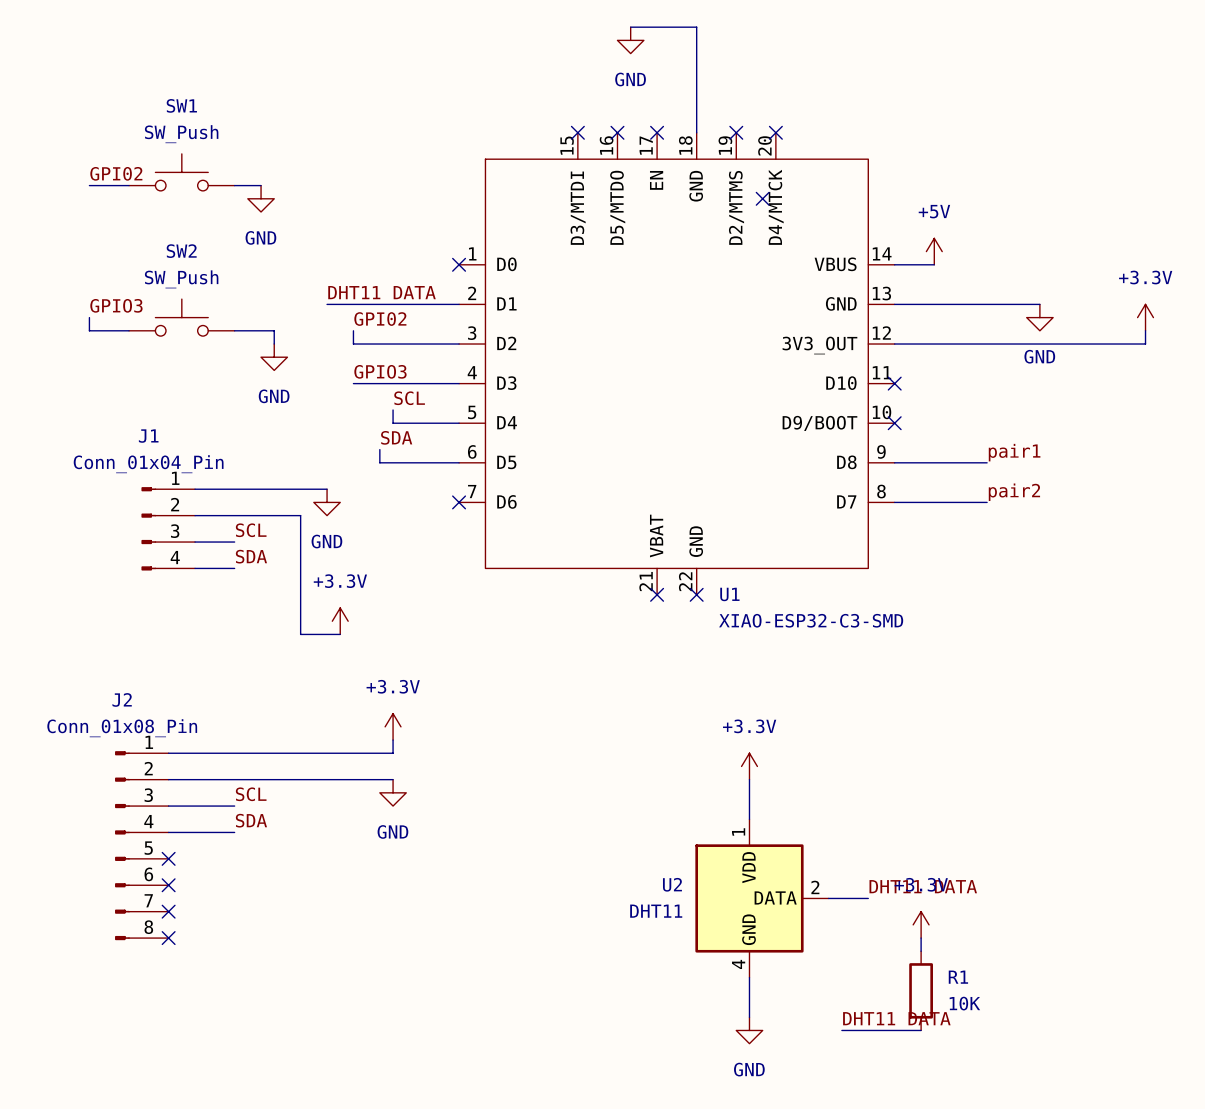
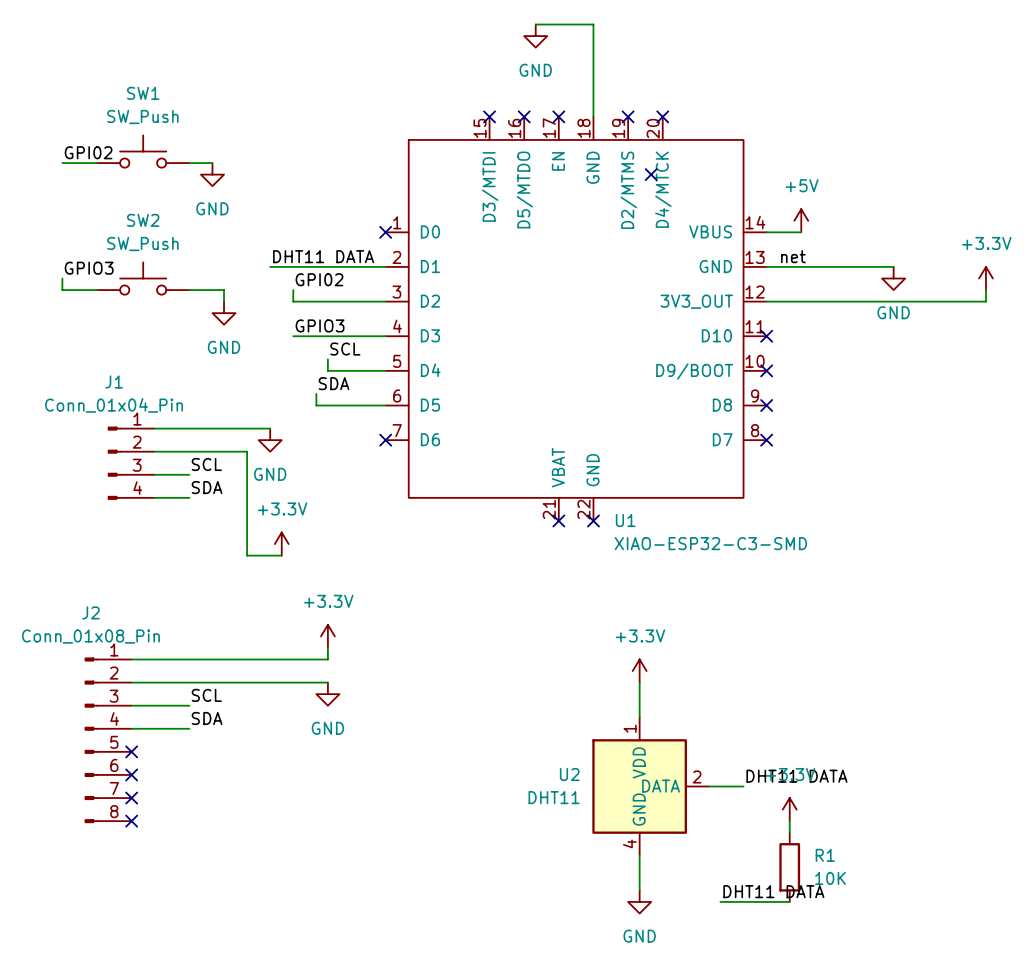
label: none -> net (793, 256)
label: pair1 (1014, 452) -> none
wire: (894, 462) (987, 462) -> none
no-connect mark: none -> (766, 405)
label: pair2 (1014, 492) -> none
wire: (894, 502) (987, 502) -> none
no-connect mark: none -> (766, 440)

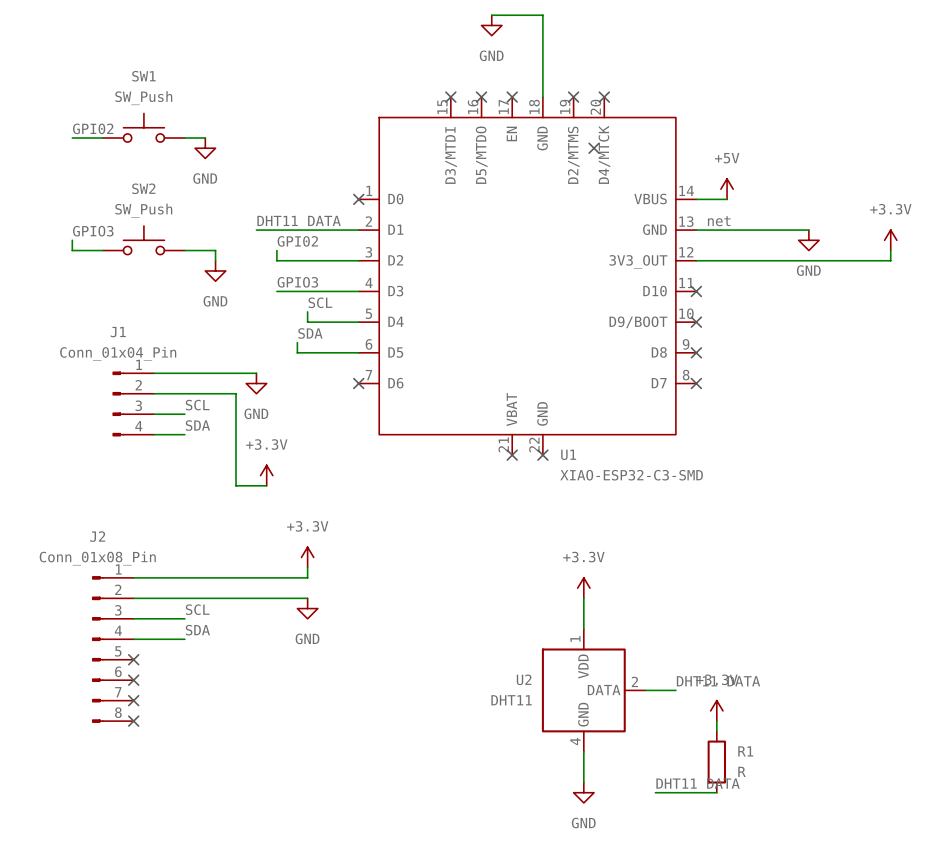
R1 value: 10K (830, 878) -> R (741, 771)

